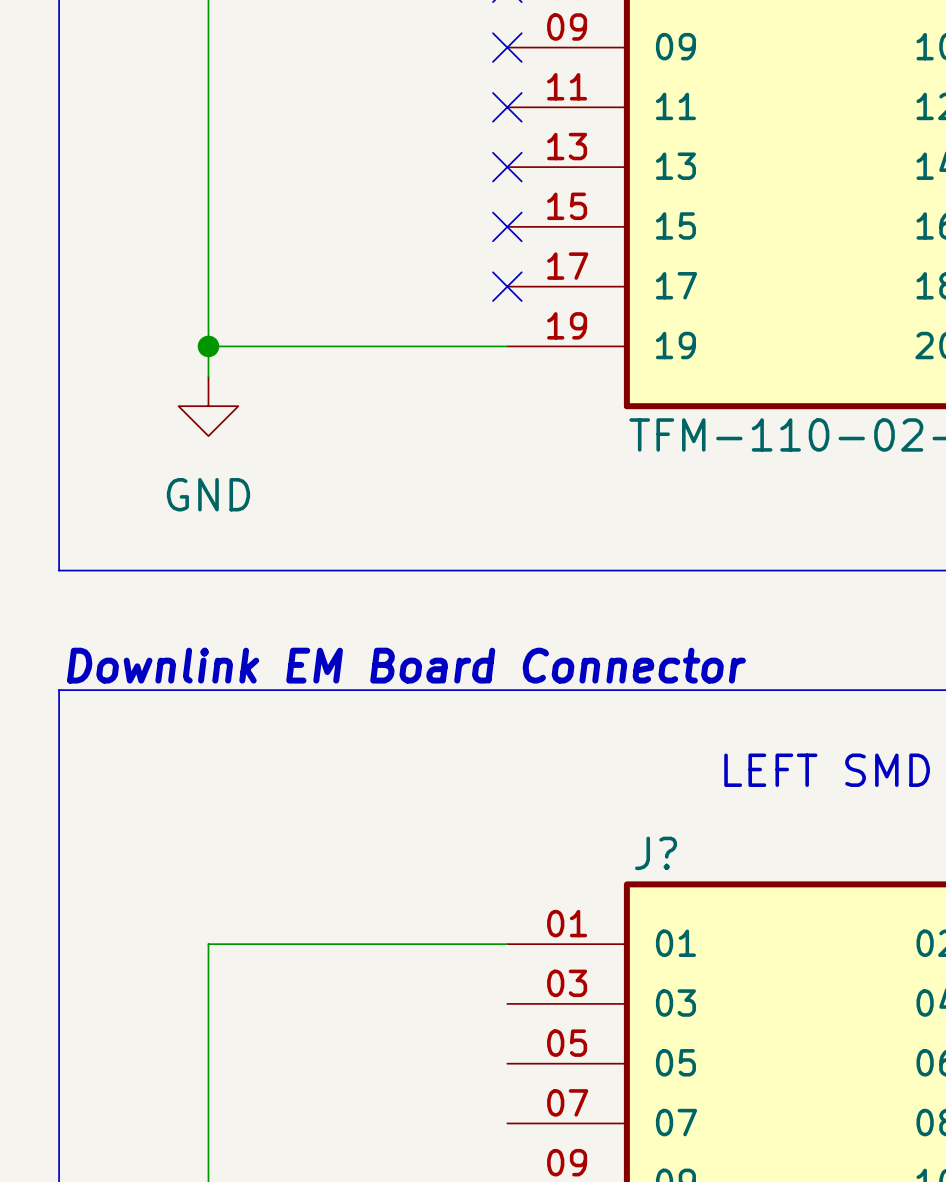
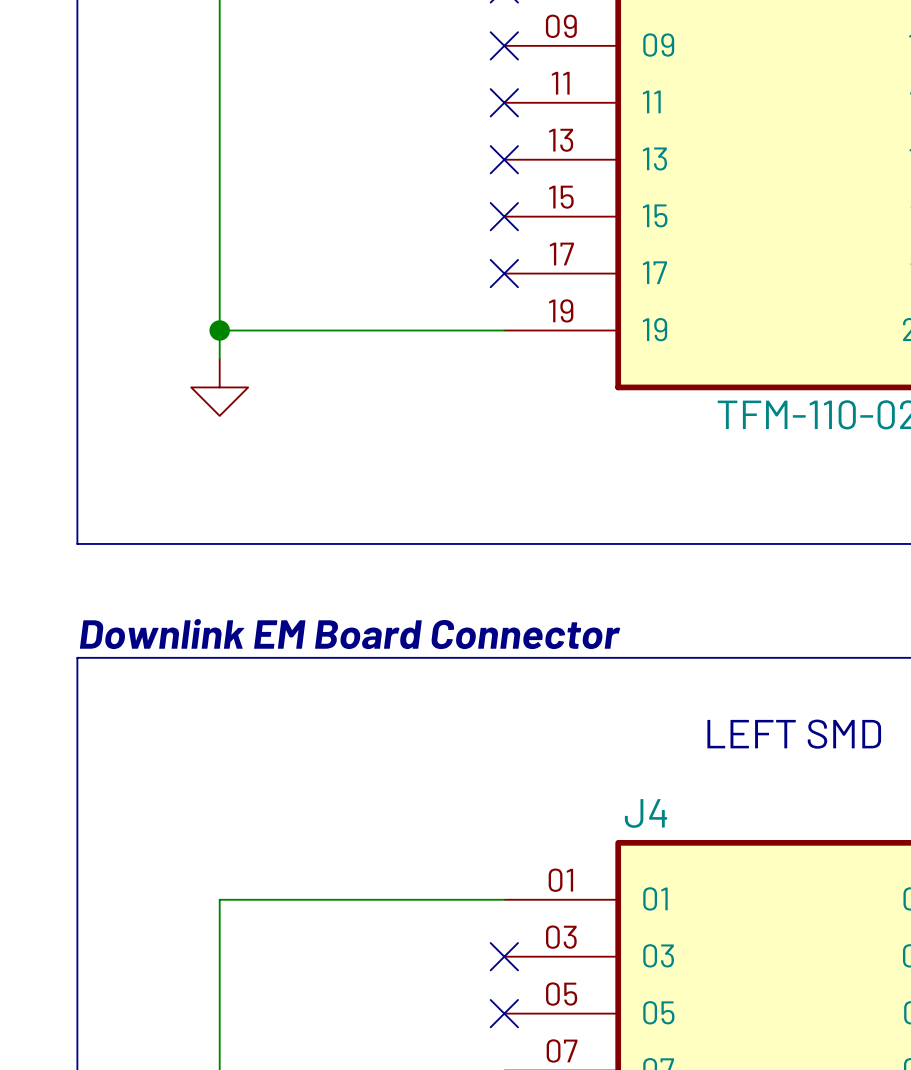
power symbol text: GND (208, 494) -> none
J? name: J? (656, 853) -> J4 (646, 813)
no-connect mark: none -> (504, 956)
no-connect mark: none -> (504, 1013)

